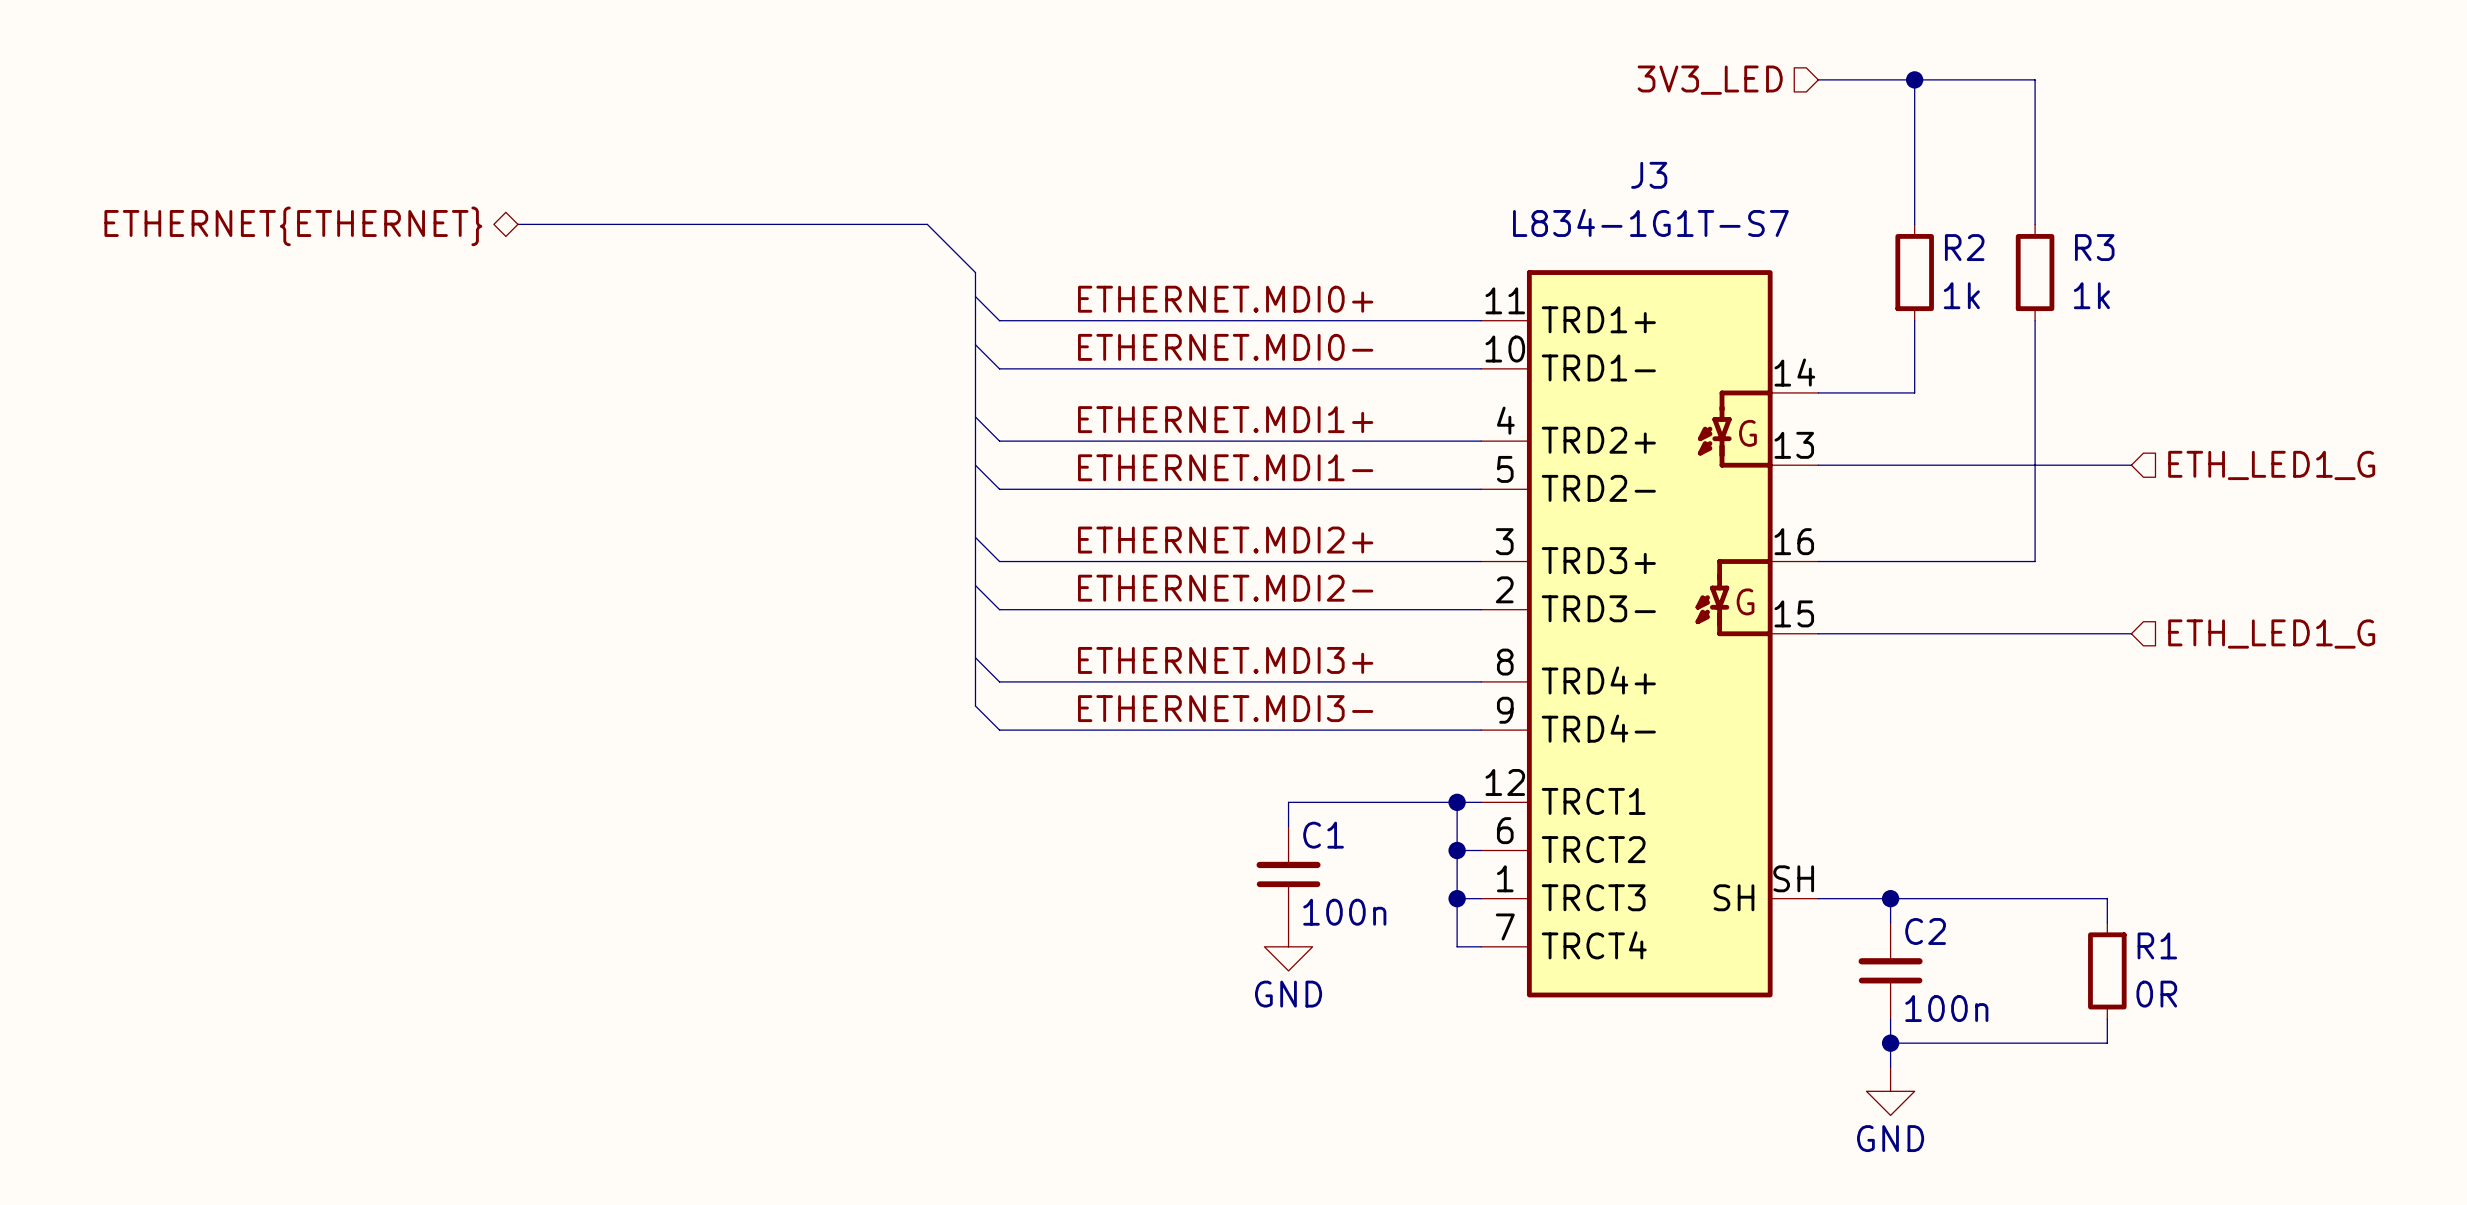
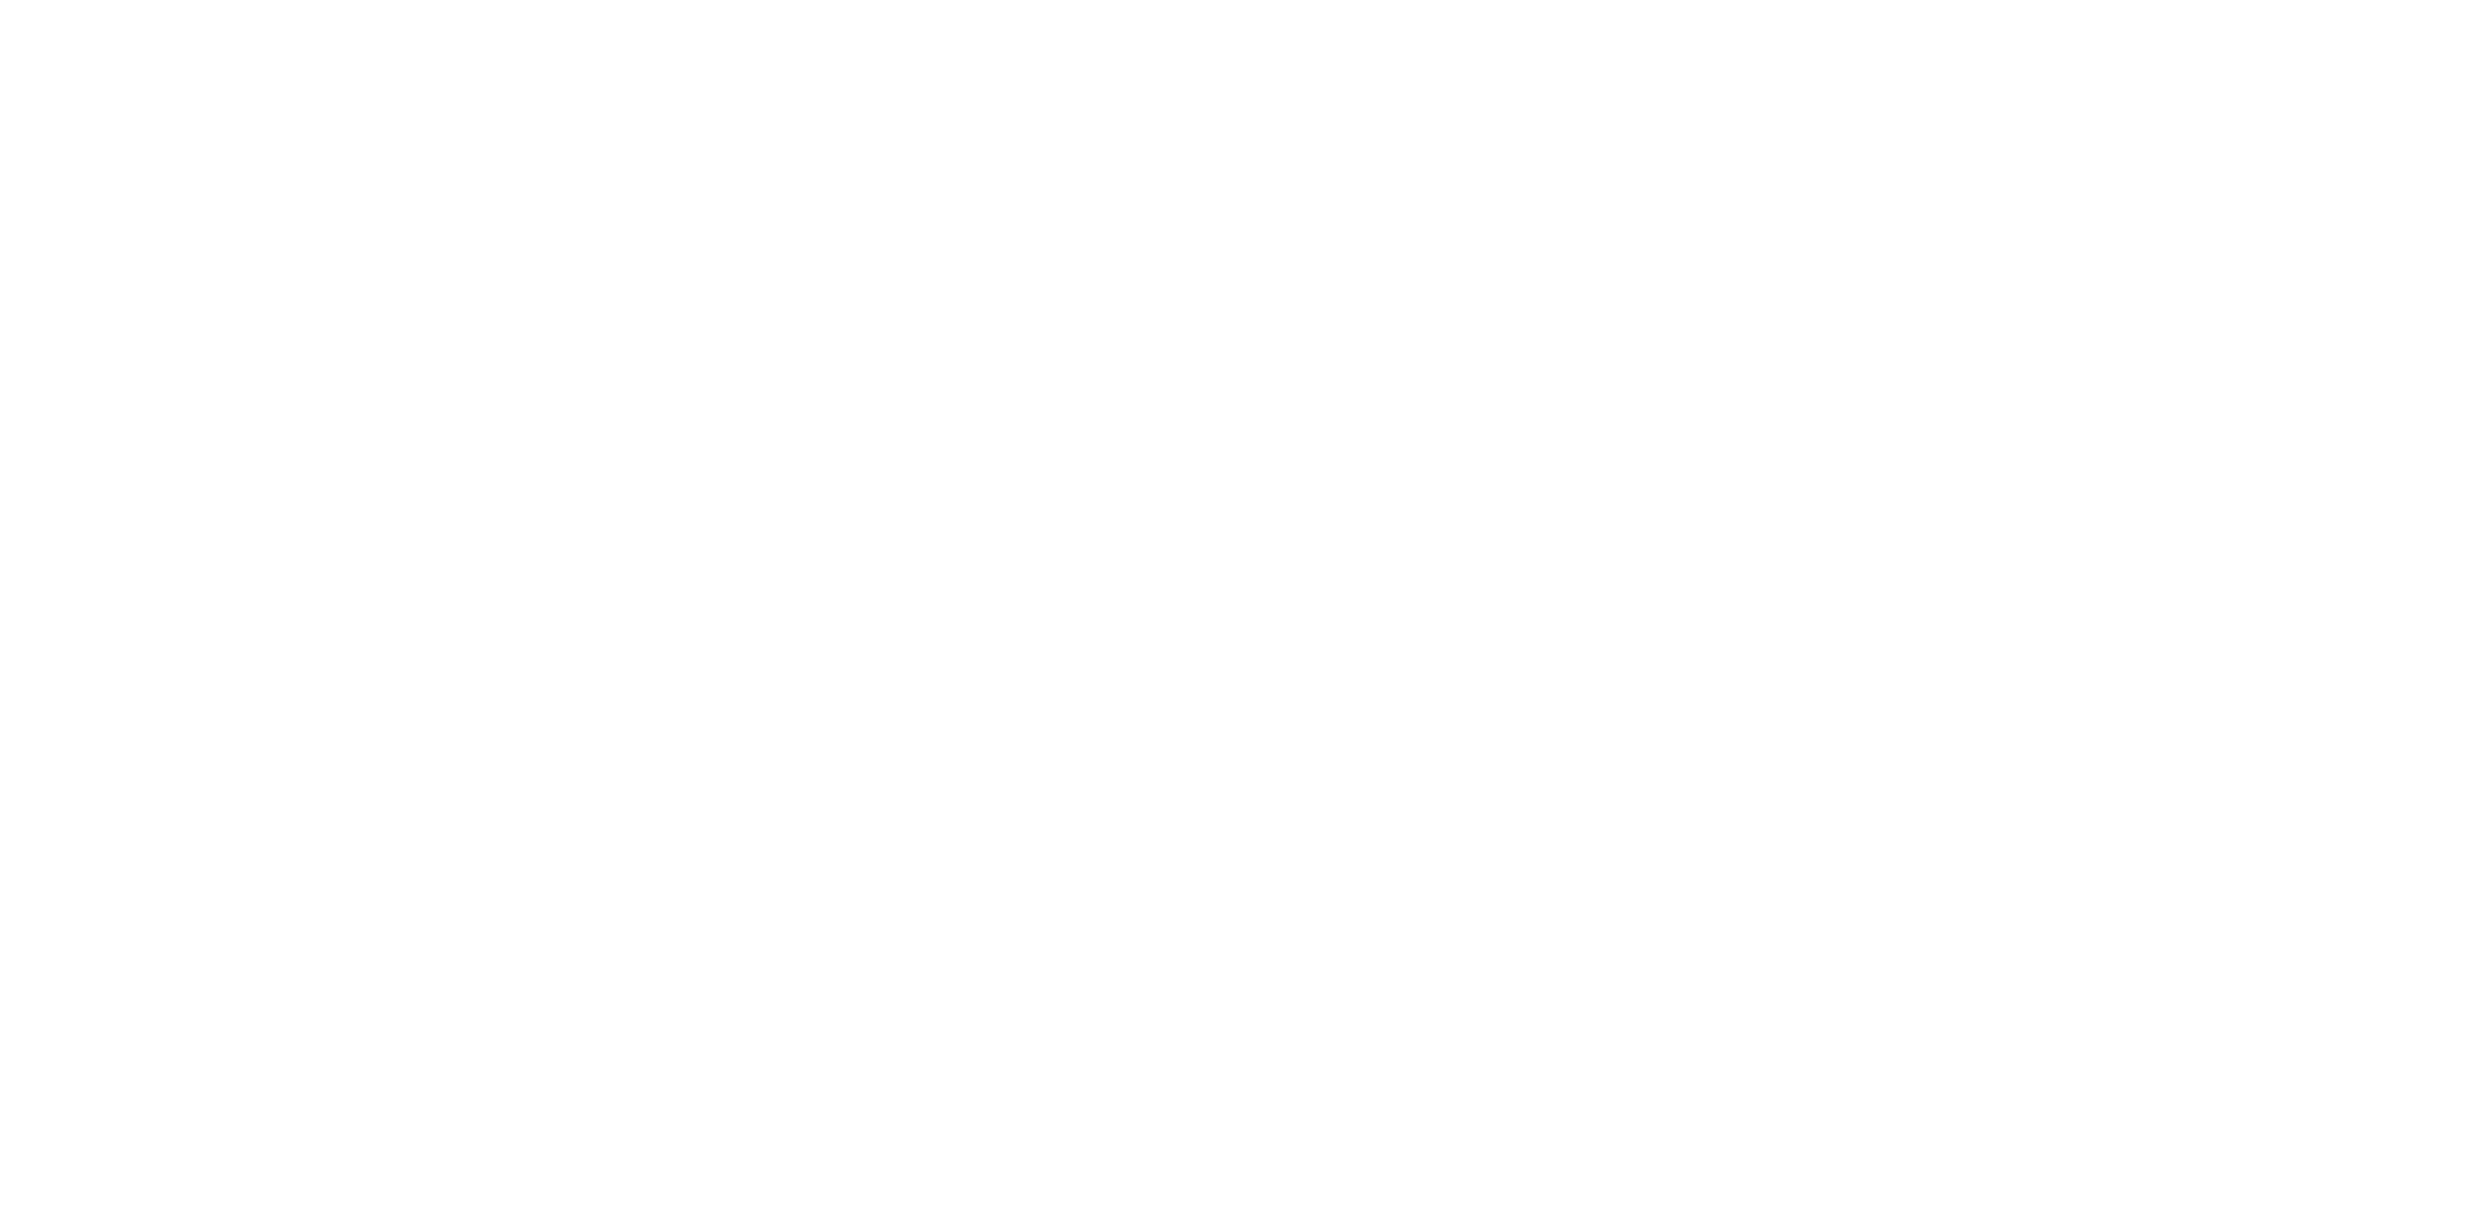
wire: (1818, 79) (2035, 79) (2035, 224) -> none
wire: (1914, 79) (1914, 224) -> none
junction: (1914, 79) -> none
hierarchical label: 3V3_LED (1710, 80) -> none
bus: (517, 224) (927, 224) (975, 272) (975, 706) -> none
hierarchical label: ETHERNET{ETHERNET} (293, 226) -> none
R2: (1914, 272) -> none
R3: (2035, 272) -> none
wire: (975, 296) (999, 320) (1481, 320) -> none
label: ETHERNET.MDI0+ (1225, 299) -> none
wire: (1914, 320) (1914, 392) (1818, 392) -> none
wire: (2035, 320) (2035, 561) (1818, 561) -> none
wire: (975, 344) (999, 368) (1481, 368) -> none
label: ETHERNET.MDI0- (1225, 347) -> none
wire: (975, 417) (999, 441) (1481, 441) -> none
label: ETHERNET.MDI1+ (1225, 419) -> none
wire: (975, 465) (999, 489) (1481, 489) -> none
wire: (1818, 465) (2131, 465) -> none
hierarchical label: ETH_LED1_G (2271, 465) -> none
label: ETHERNET.MDI1- (1225, 467) -> none
wire: (975, 537) (999, 561) (1481, 561) -> none
label: ETHERNET.MDI2+ (1225, 540) -> none
wire: (975, 585) (999, 609) (1481, 609) -> none
label: ETHERNET.MDI2- (1225, 588) -> none
J3: (1649, 633) -> none
wire: (1818, 633) (2131, 633) -> none
hierarchical label: ETH_LED1_G (2271, 634) -> none
wire: (975, 657) (999, 681) (1481, 681) -> none
label: ETHERNET.MDI3+ (1225, 660) -> none
wire: (975, 706) (999, 730) (1481, 730) -> none
label: ETHERNET.MDI3- (1225, 708) -> none
wire: (1457, 802) (1457, 946) (1481, 946) -> none
junction: (1457, 802) -> none
wire: (1481, 802) (1288, 802) (1288, 826) -> none
wire: (1457, 850) (1481, 850) -> none
junction: (1457, 850) -> none
C1: (1288, 874) -> none
wire: (1457, 898) (1481, 898) -> none
junction: (1457, 898) -> none
wire: (1818, 898) (2107, 898) (2107, 922) -> none
wire: (1890, 898) (1890, 922) -> none
junction: (1890, 898) -> none
power symbol: GND (1288, 946) -> none
C2: (1890, 970) -> none
R1: (2107, 970) -> none
wire: (1890, 1019) (1890, 1067) -> none
wire: (2107, 1019) (2107, 1043) (1890, 1043) -> none
junction: (1890, 1043) -> none
power symbol: GND (1890, 1091) -> none

